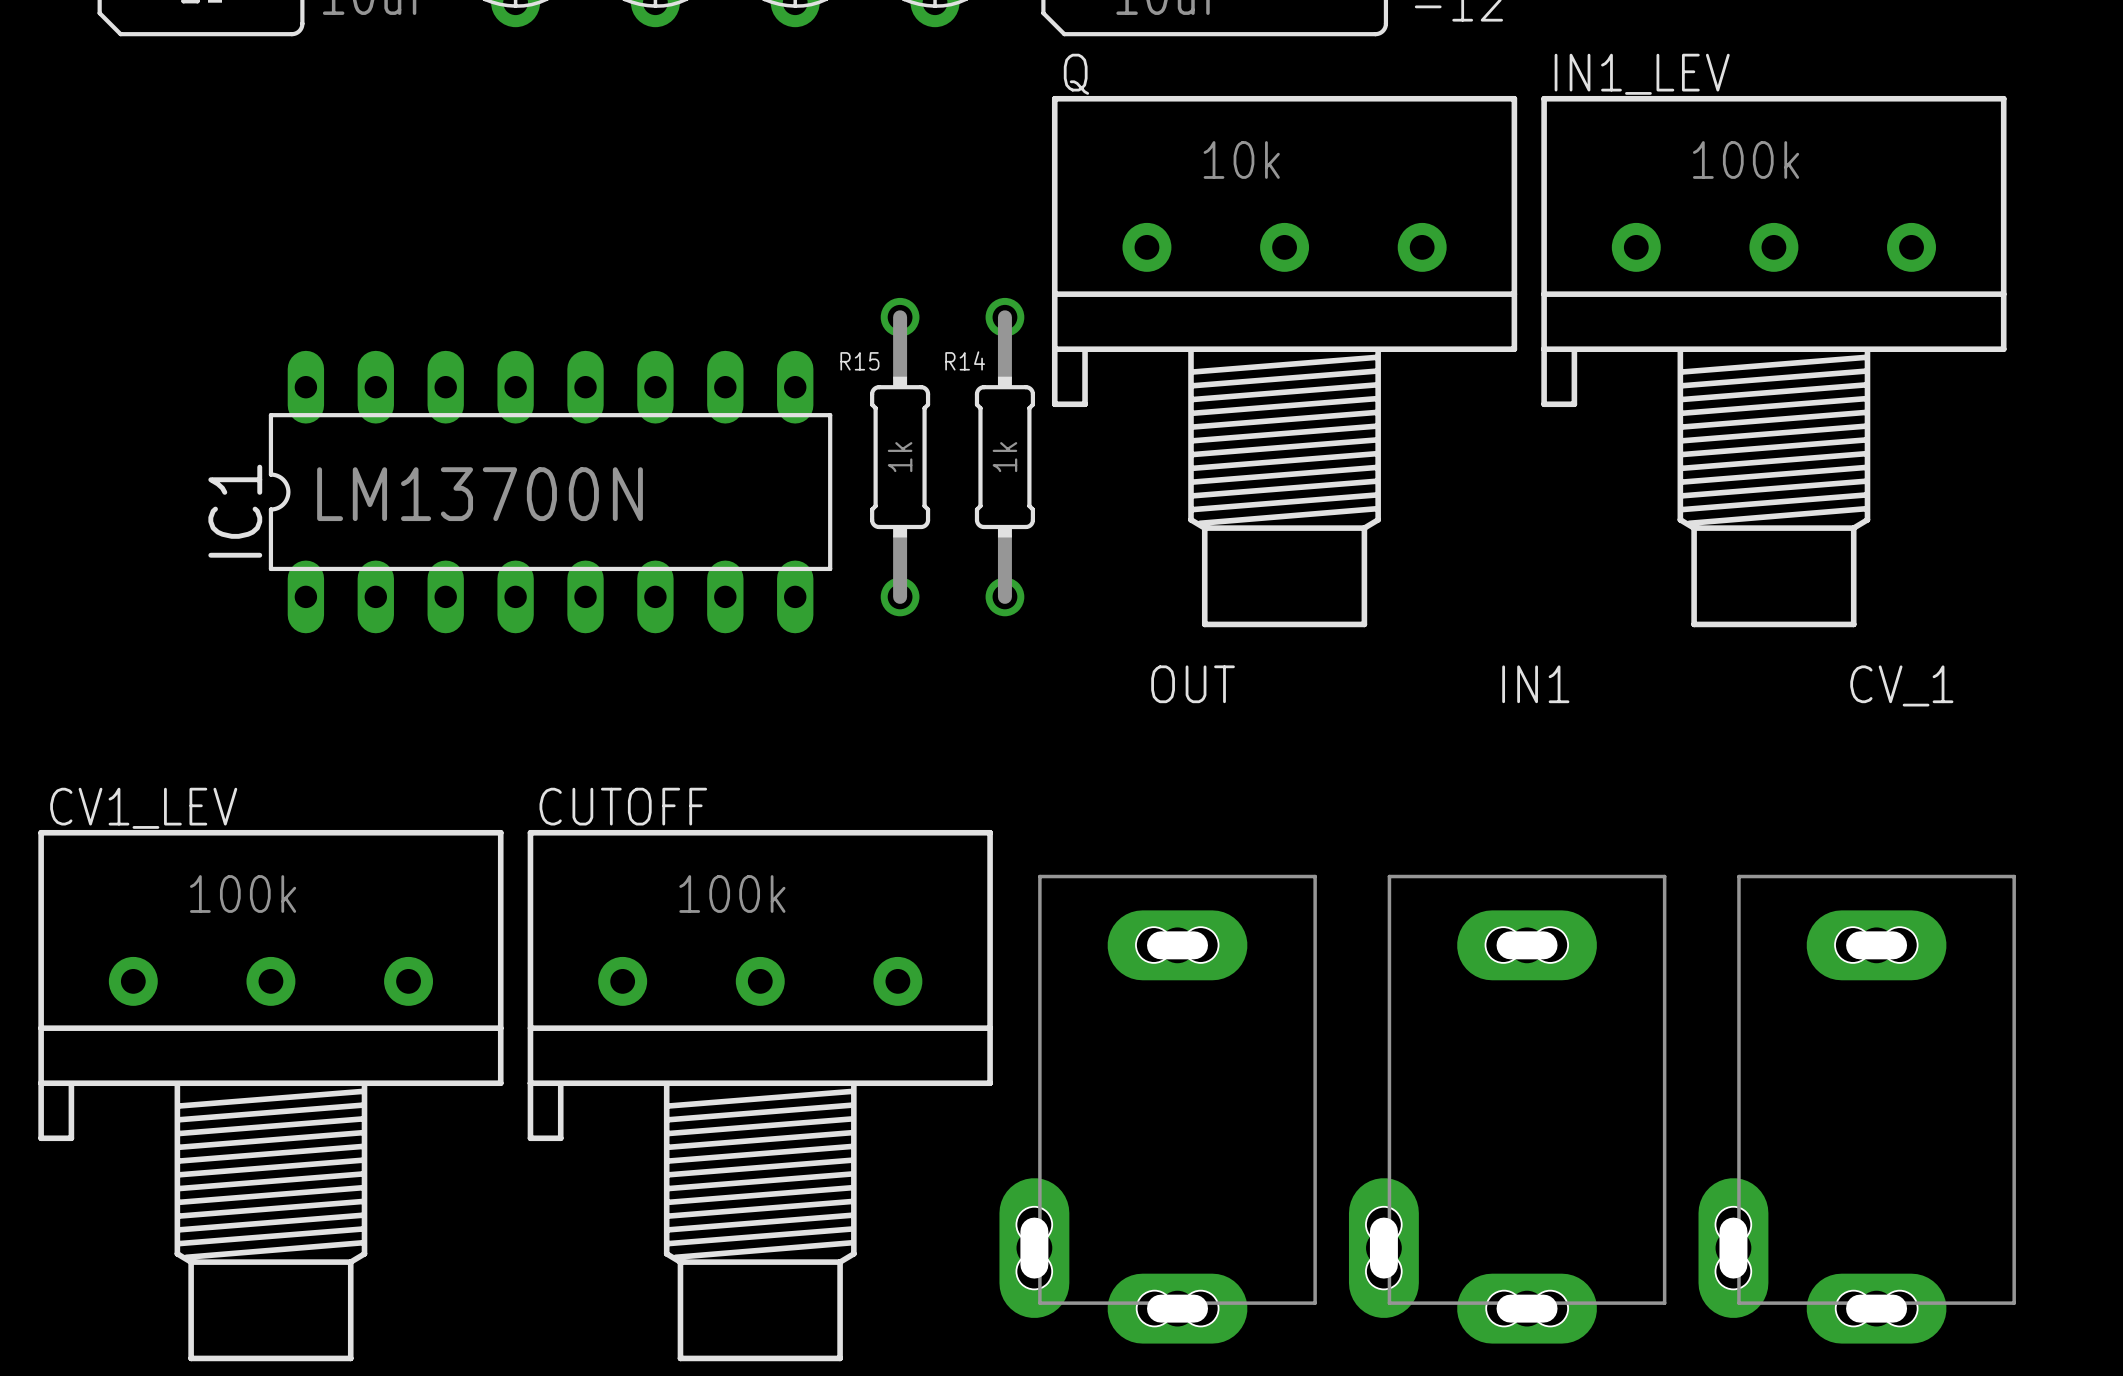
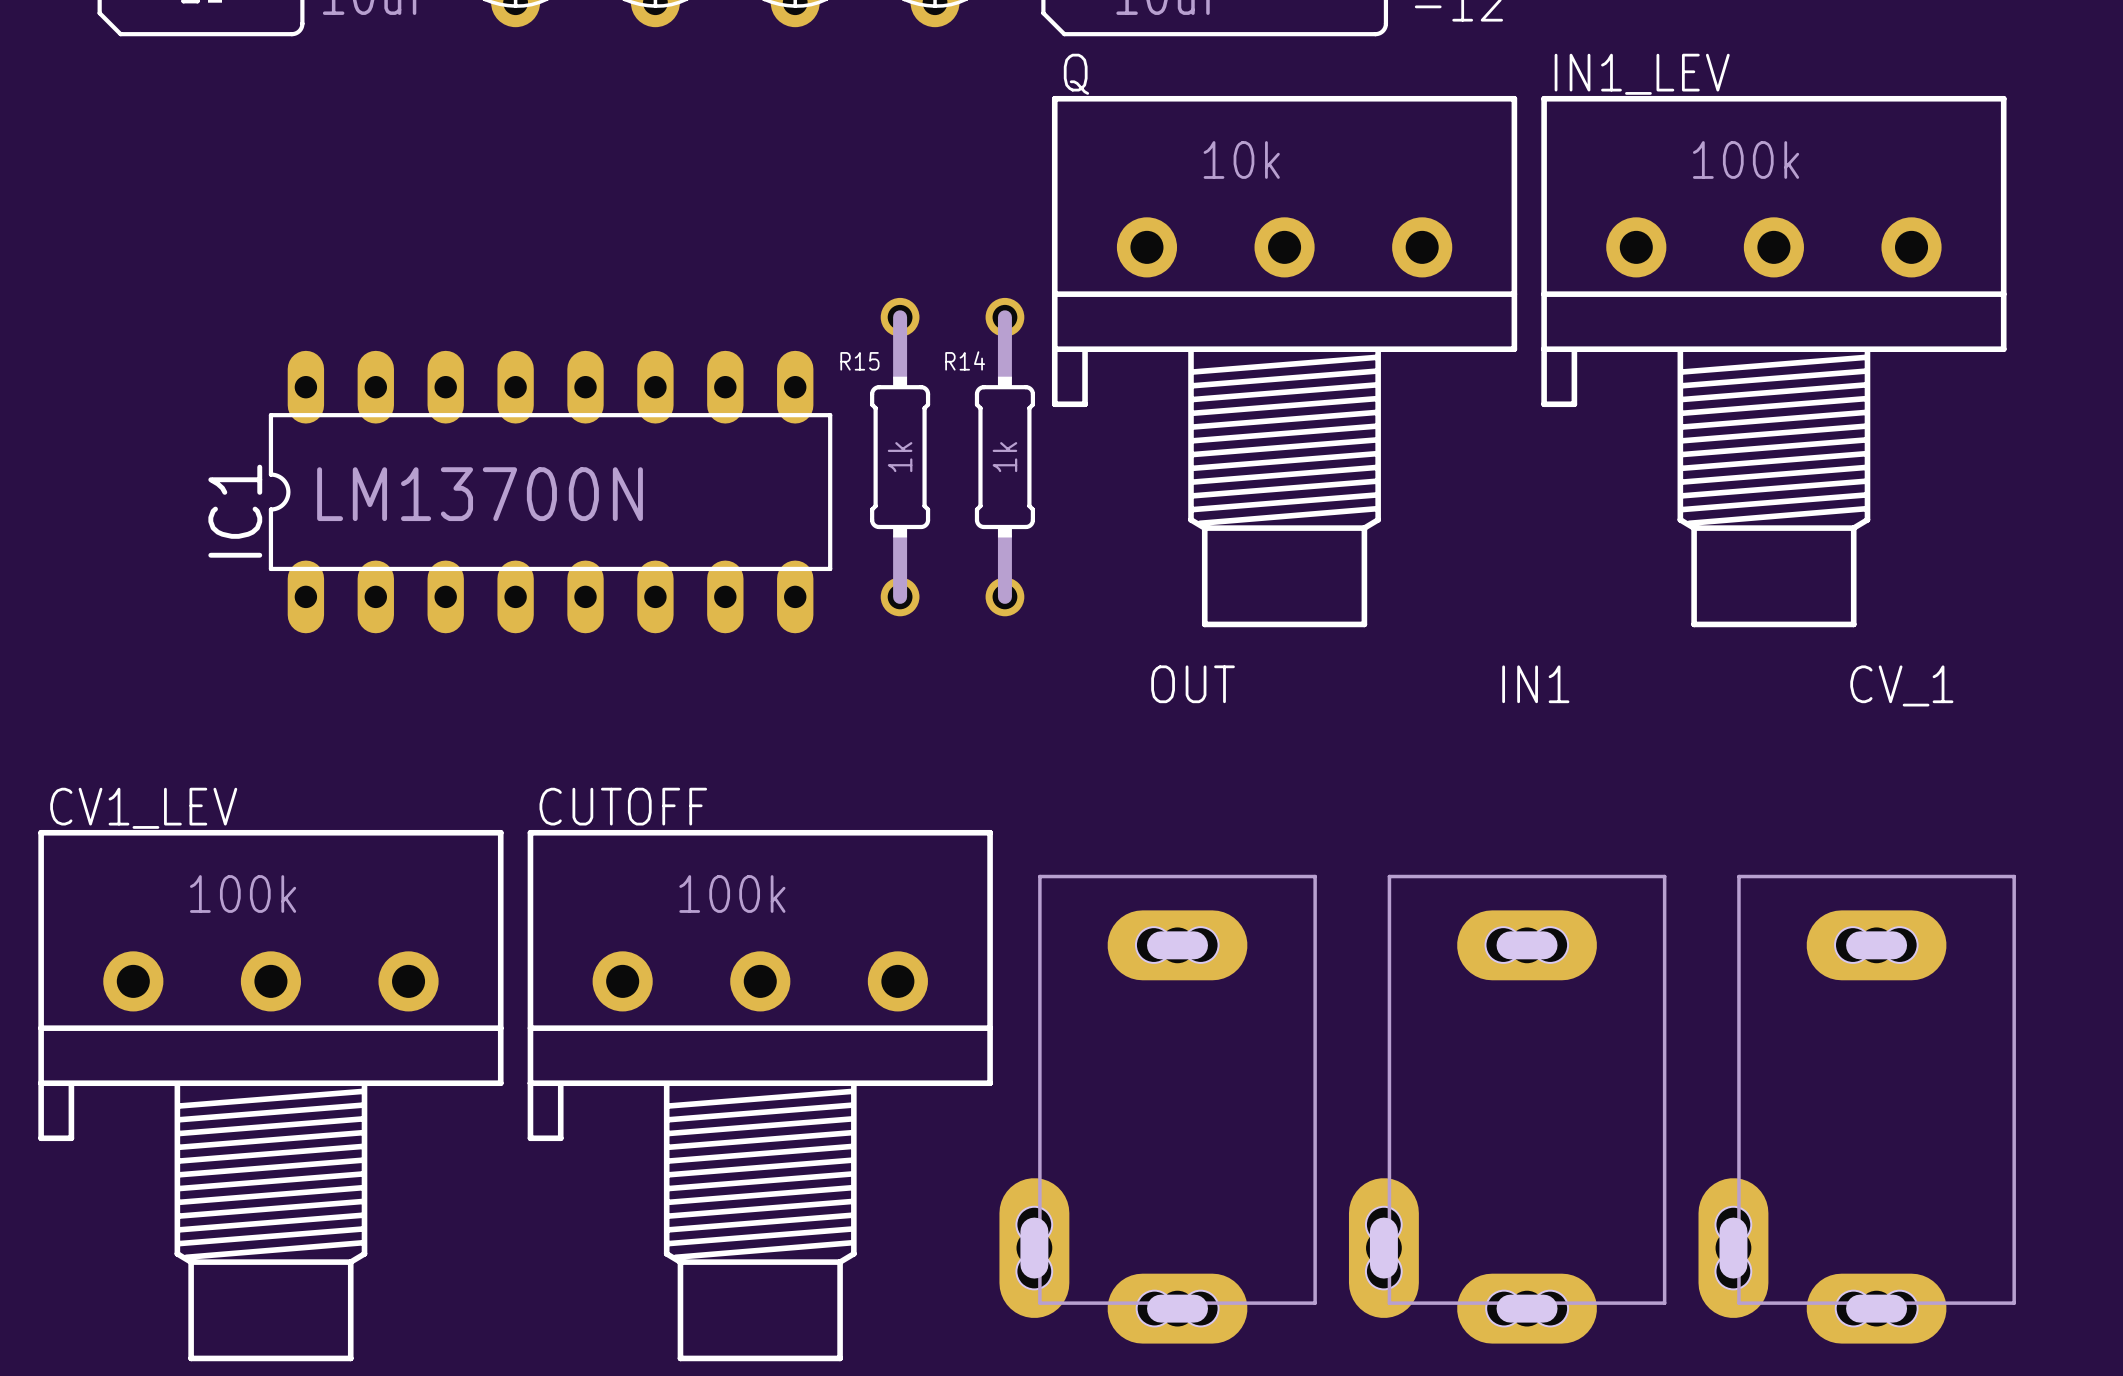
Q footprint: [1051, 95, 1518, 628] -> [1051, 95, 1518, 628]
IN1_LEV footprint: [1541, 95, 2007, 628] -> [1541, 95, 2007, 628]
CV1_LEV footprint: [38, 829, 504, 1362] -> [38, 829, 504, 1362]
CUTOFF footprint: [527, 829, 993, 1362] -> [527, 829, 993, 1362]

